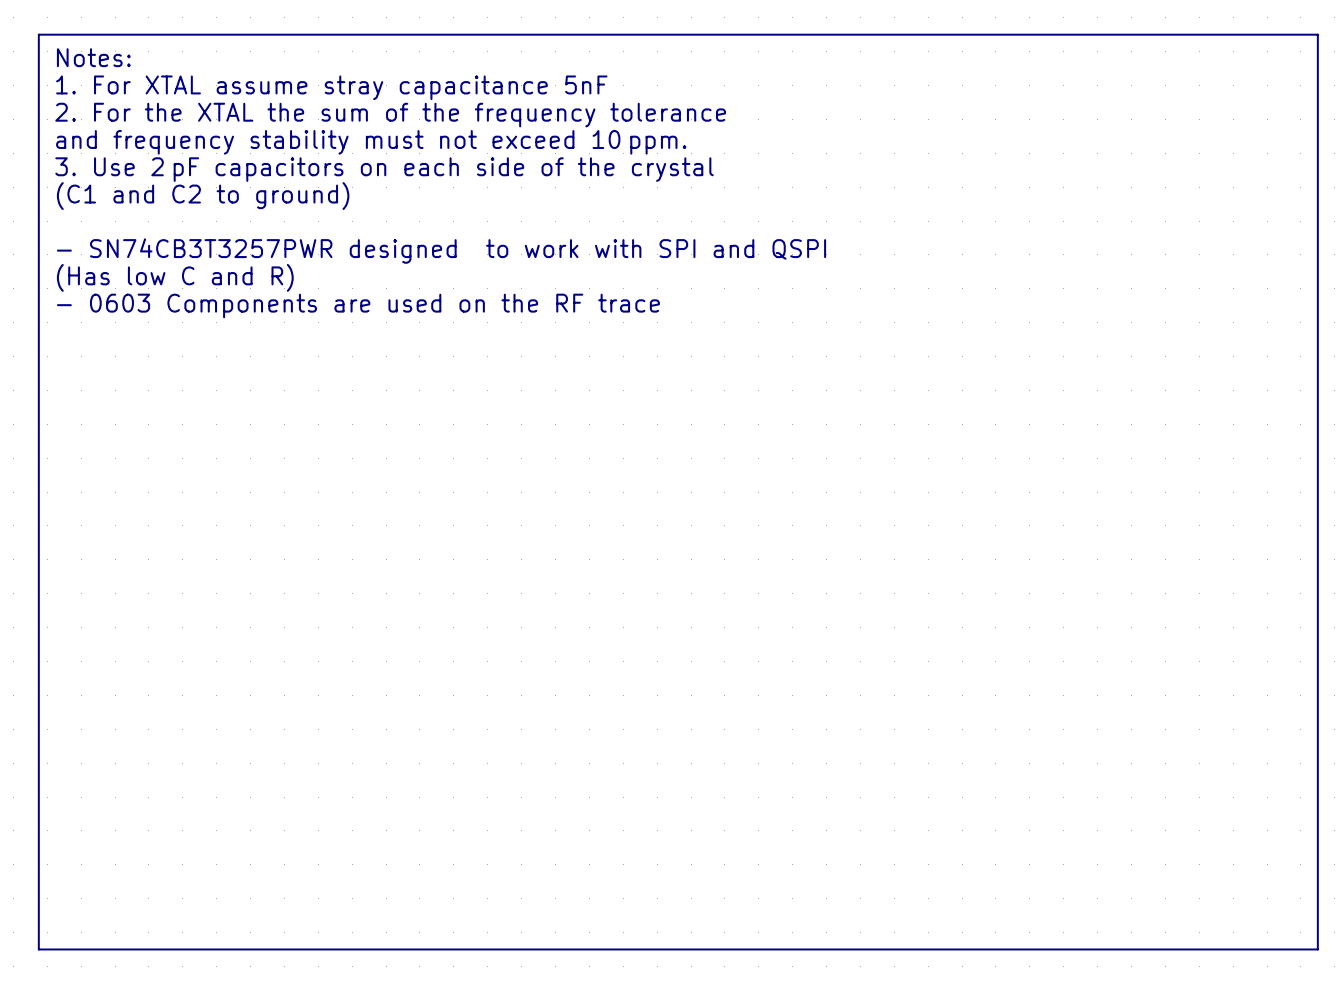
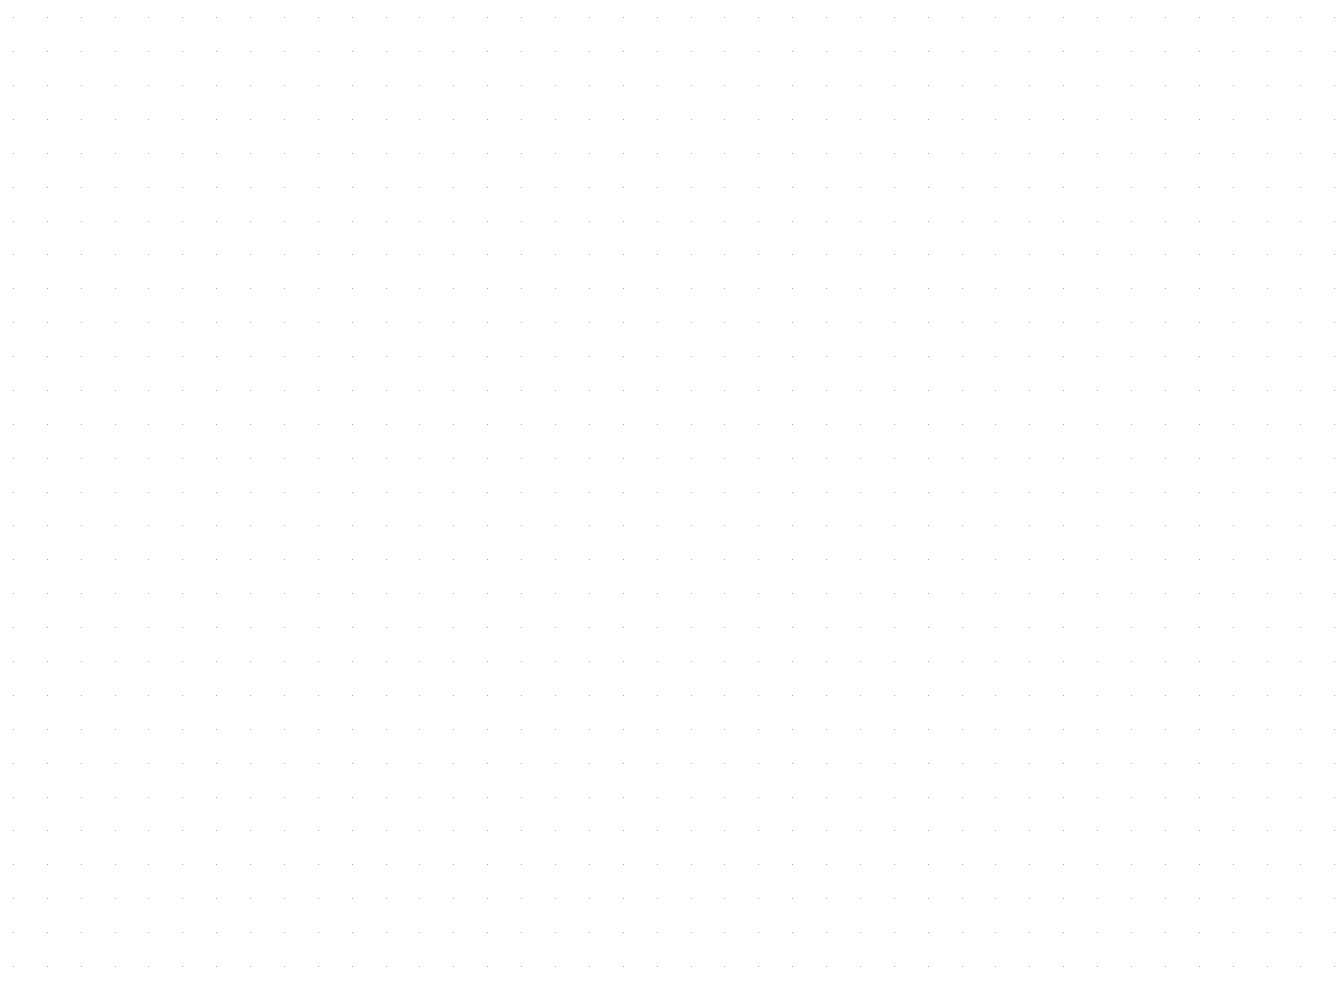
line: (38, 34) (1317, 34) (1317, 949) (38, 949) (38, 34) -> none
text: Notes: (93, 57) -> none
text: 1. For XTAL assume stray capacitance 5nF (331, 87) -> none
text: 2. For the XTAL the sum of the frequency tolerance (390, 115) -> none
text: and frequency stability must not exceed 10 ppm. (371, 142) -> none
text: 3. Use 2 pF capacitors on each side of the crystal (384, 169) -> none
text: (C1 and C2 to ground) (203, 196) -> none
text: - SN74CB3T3257PWR designed to work with SPI and QSPI (441, 251) -> none
text: (Has low C and R) (175, 277) -> none
text: - 0603 Components are used on the RF trace (358, 305) -> none

